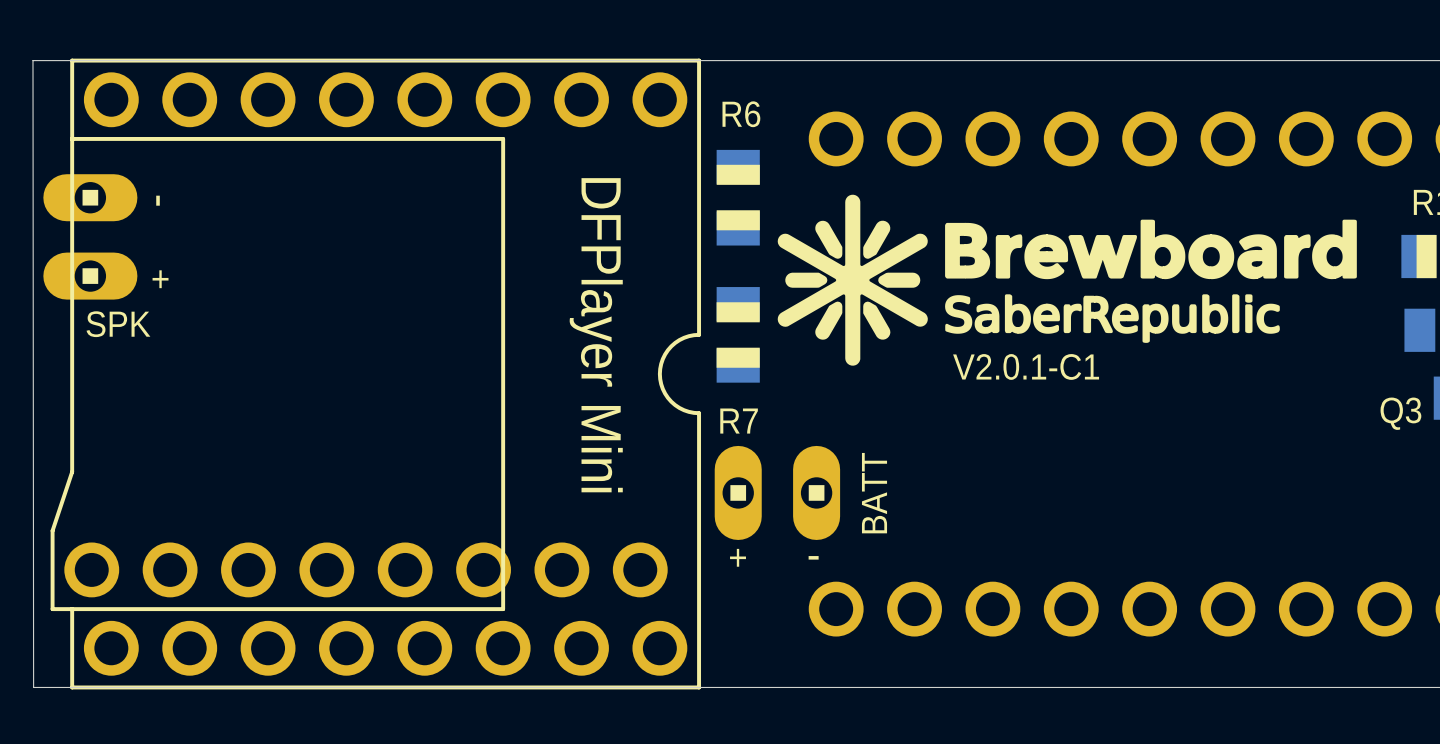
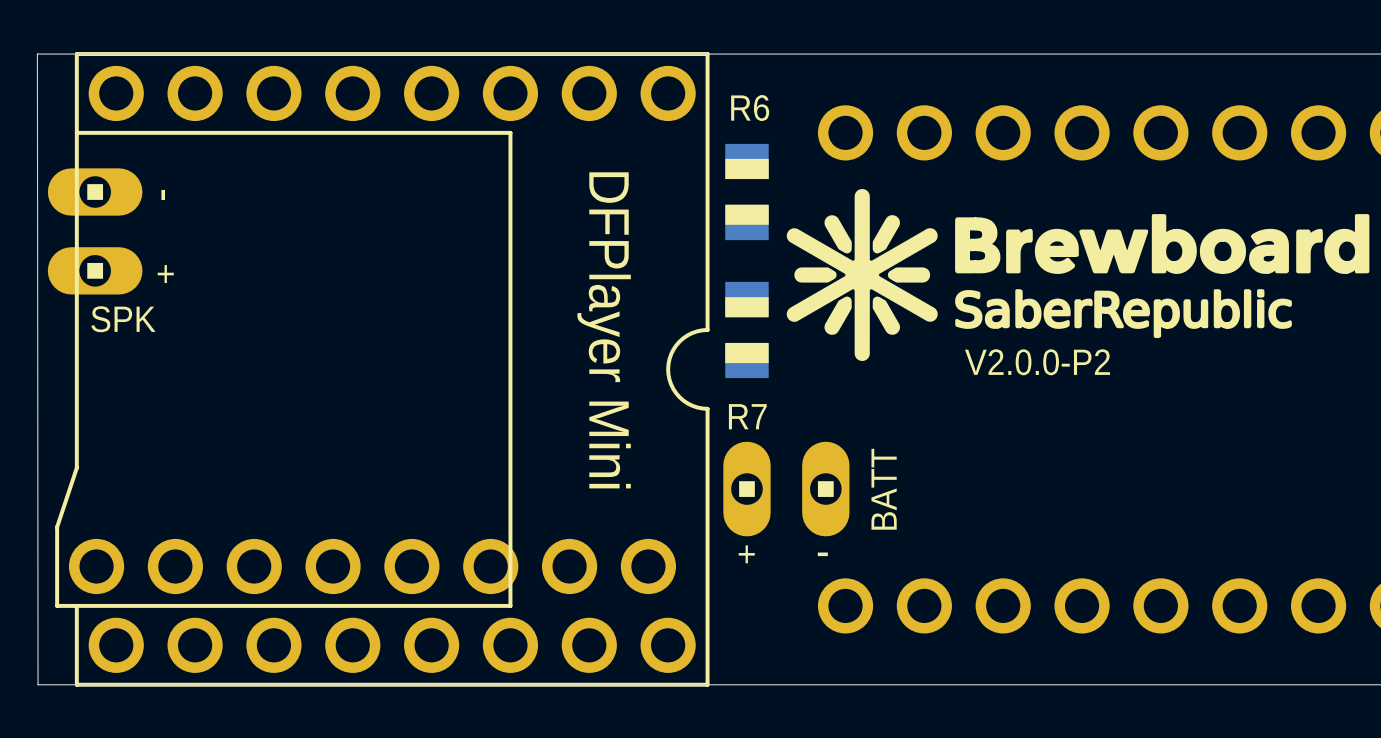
text: V2.0.1-C1 (1026, 366) -> V2.0.0-P2 (1037, 362)

